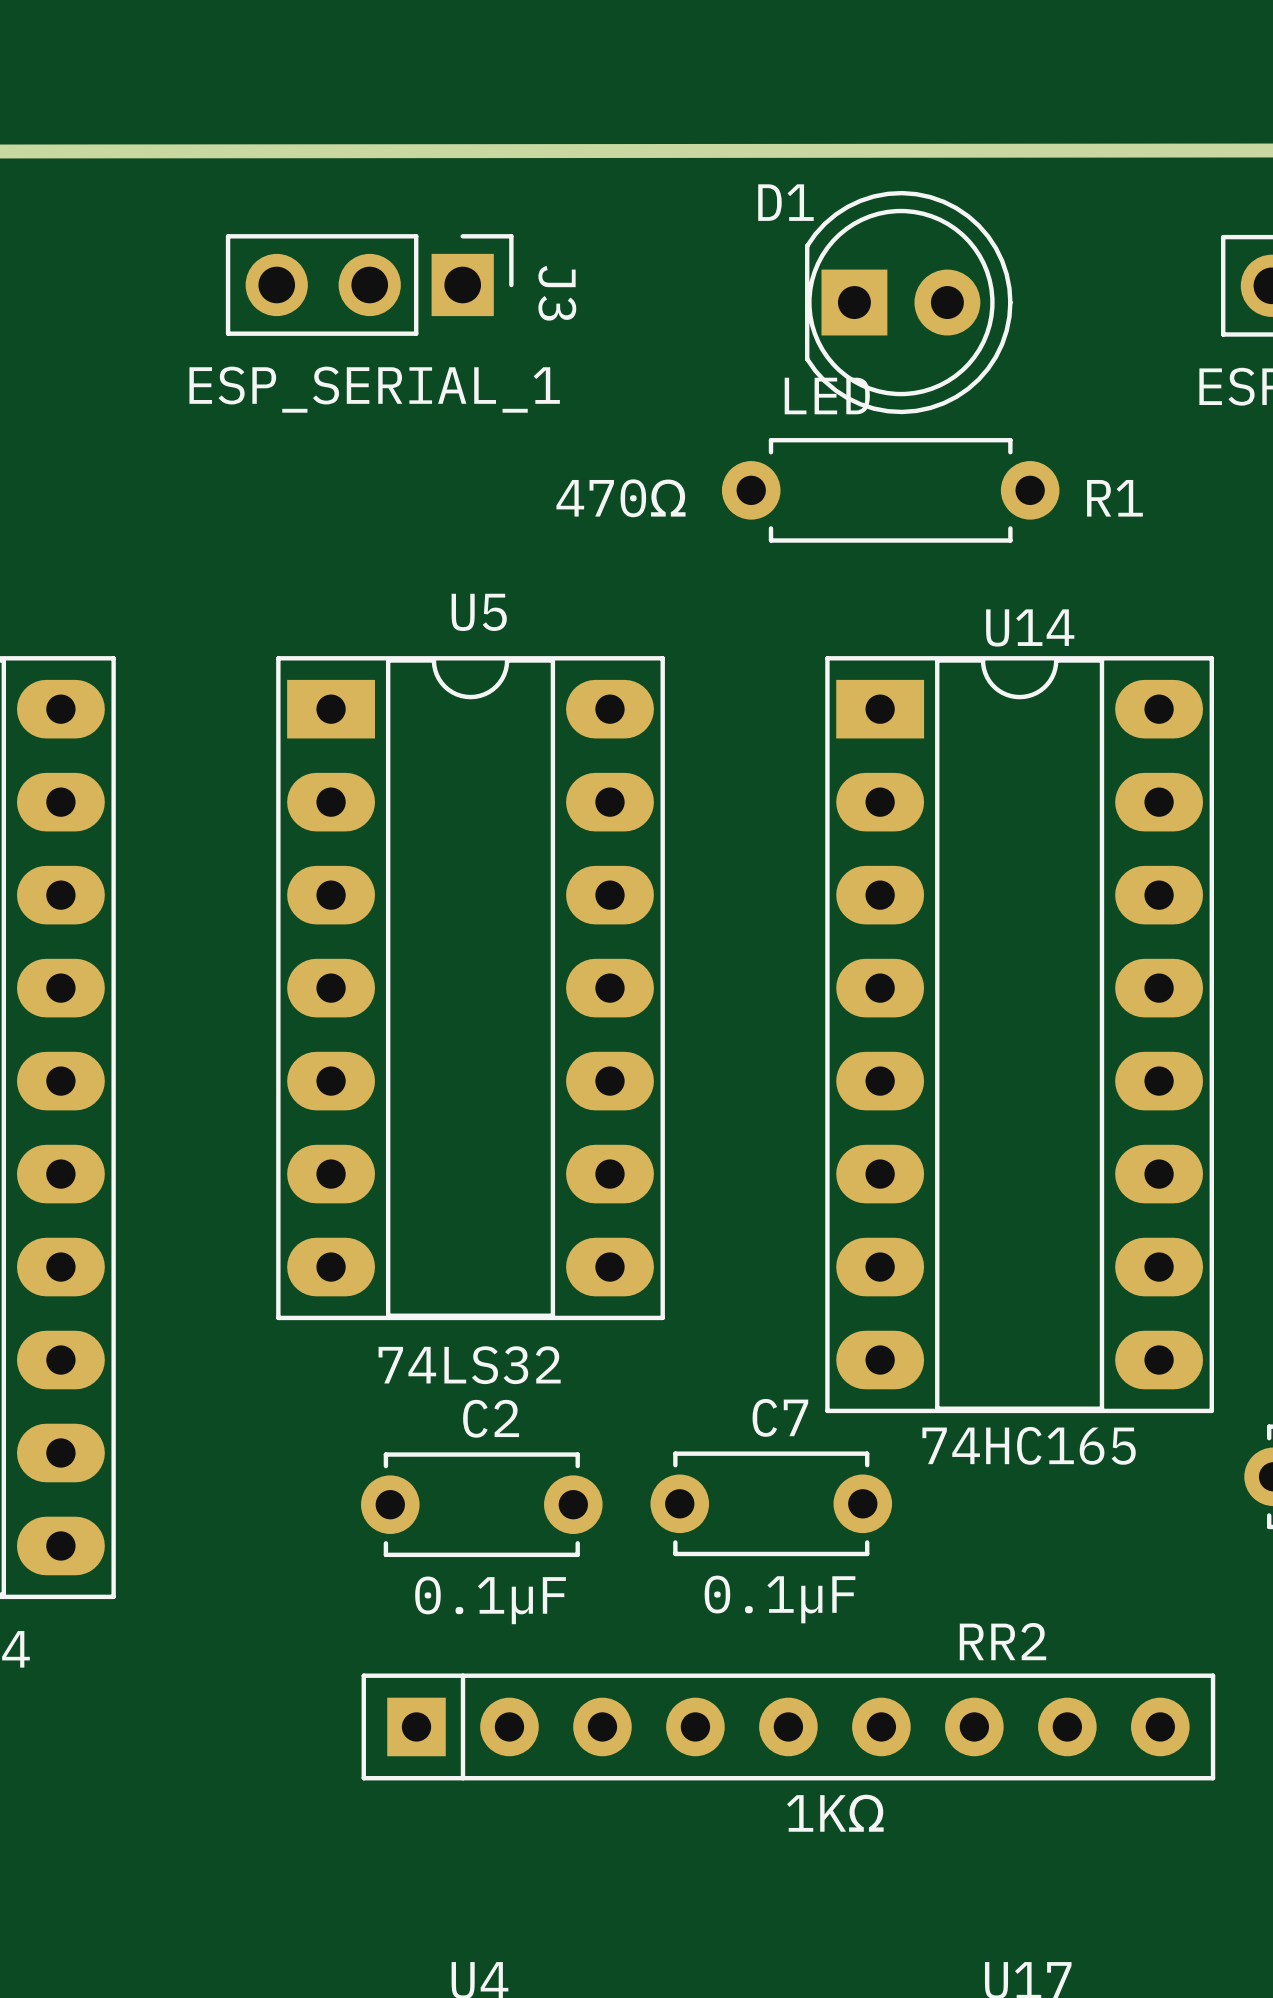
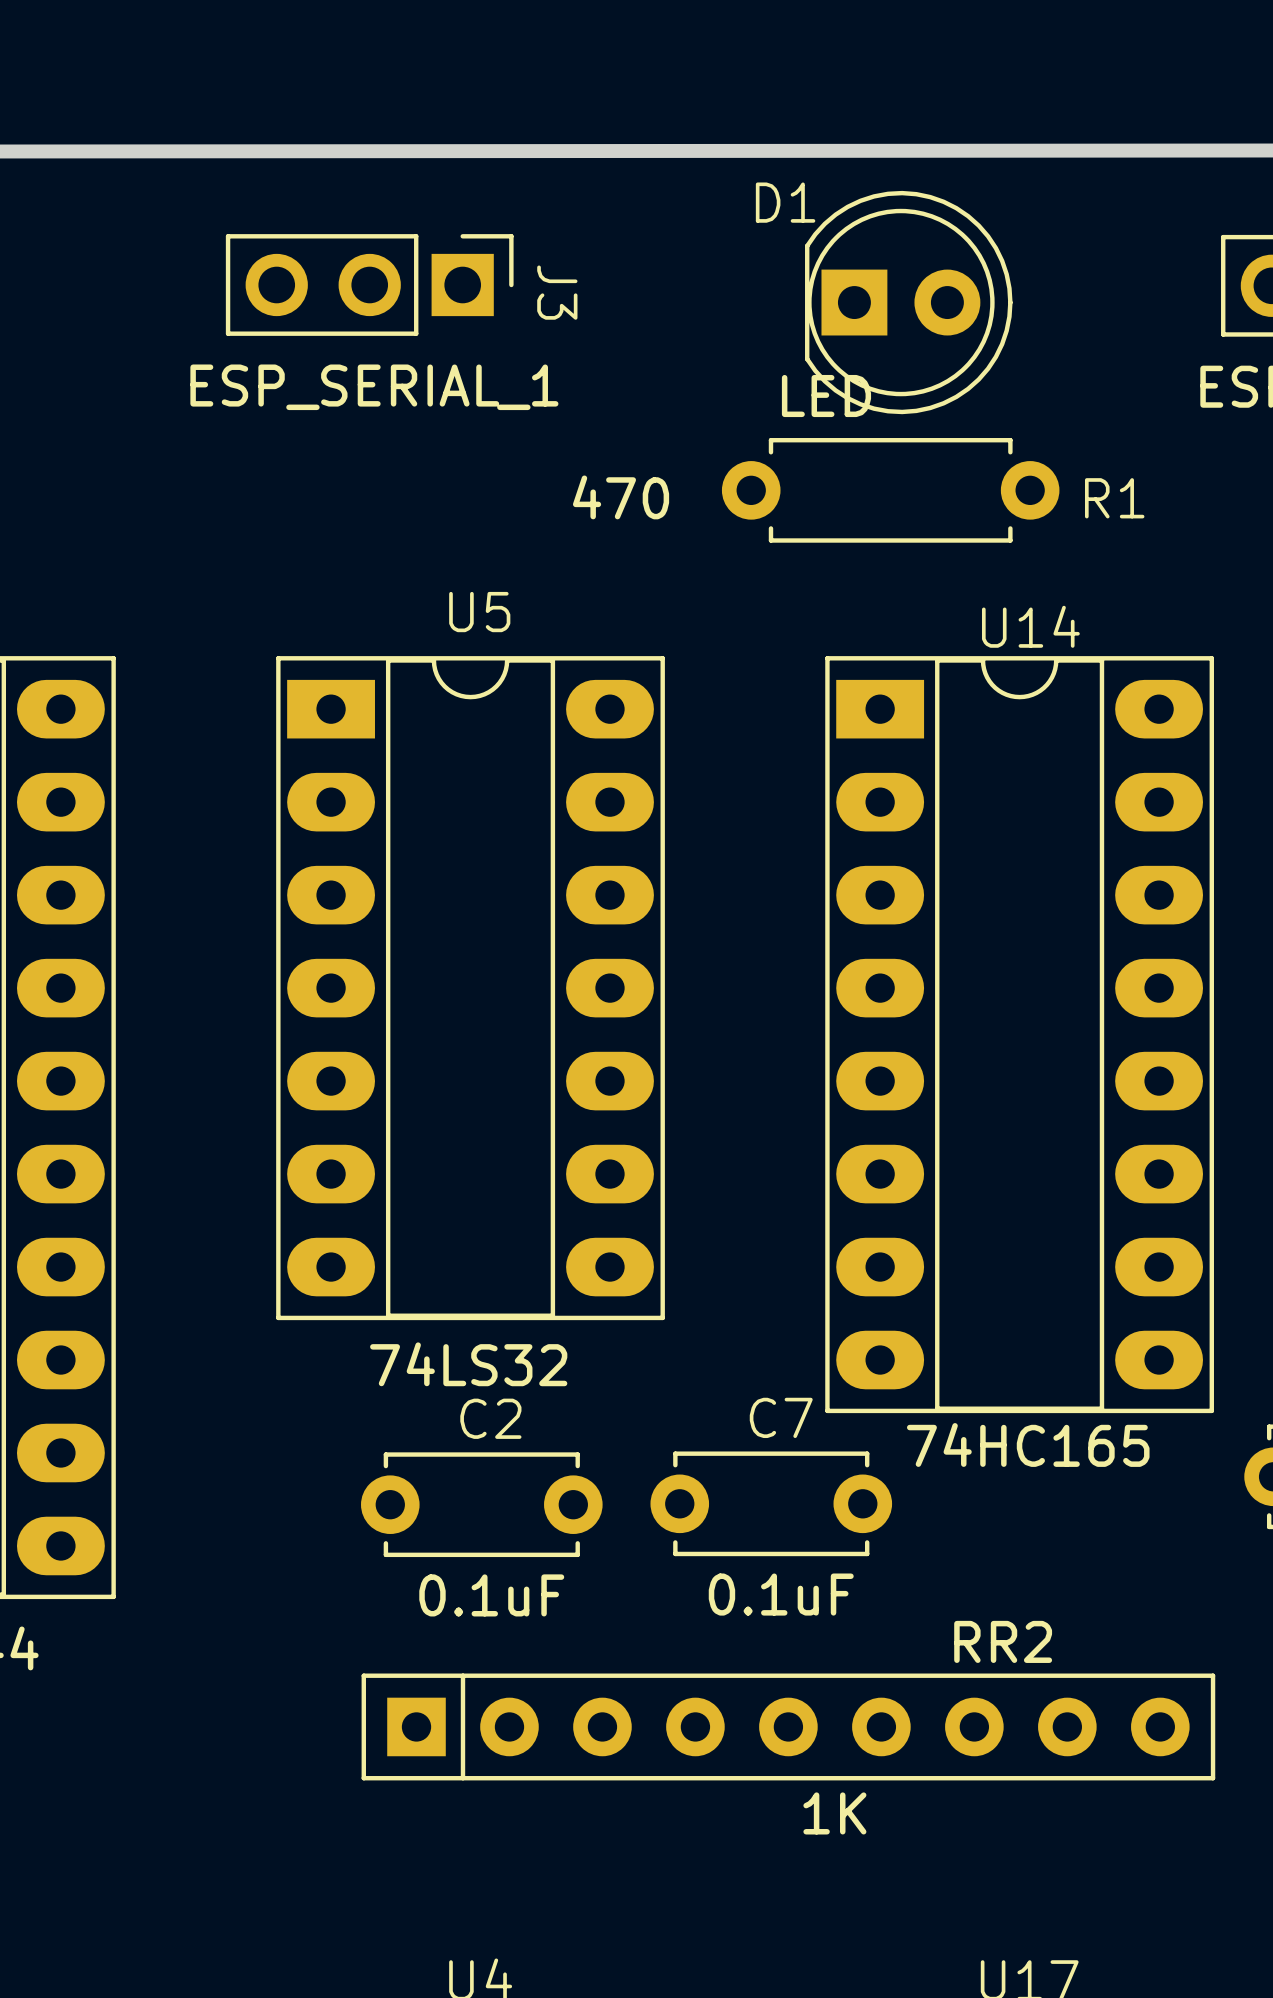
R1 value: 470Ω (620, 498) -> 470 (621, 497)
C7 value: 0.1µF (779, 1599) -> 0.1uF (781, 1594)
C2 value: 0.1µF (490, 1600) -> 0.1uF (491, 1595)
RR2 value: 1KΩ (835, 1813) -> 1K (834, 1813)

